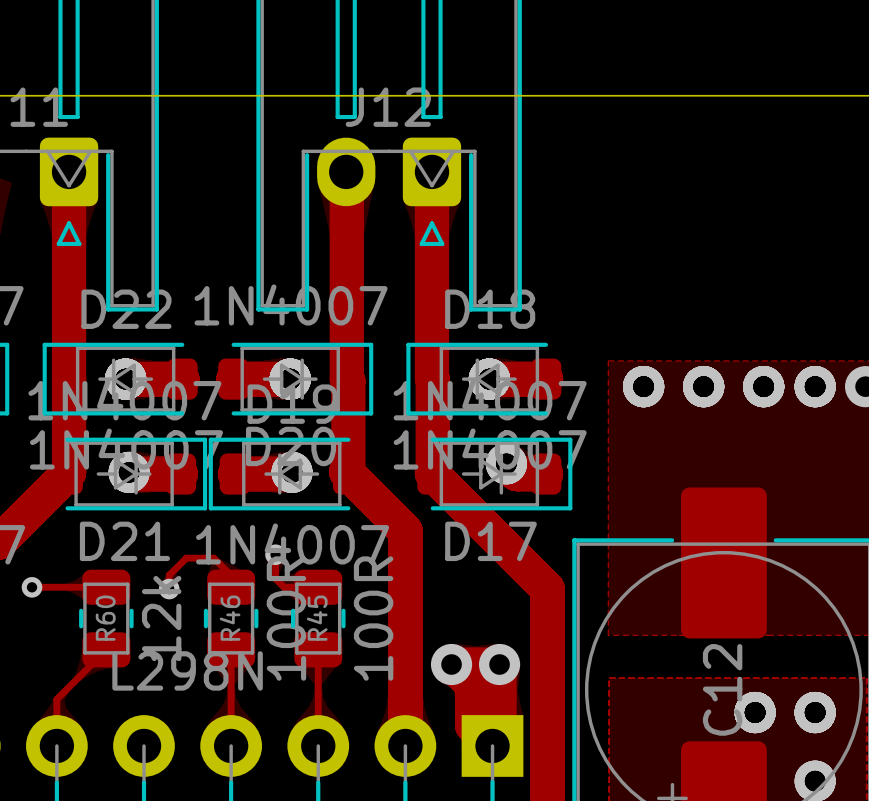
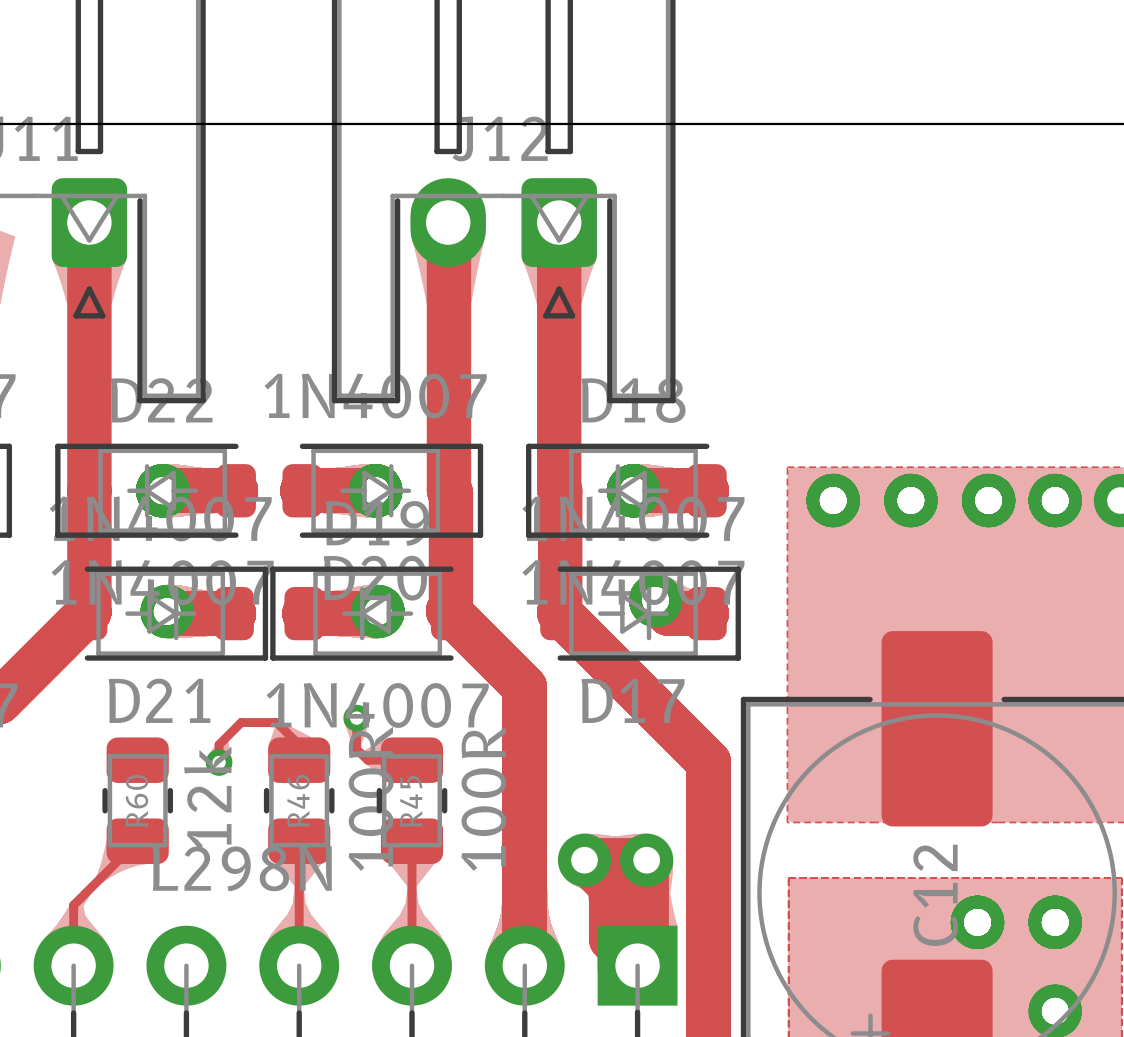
via: (32, 587) -> none

